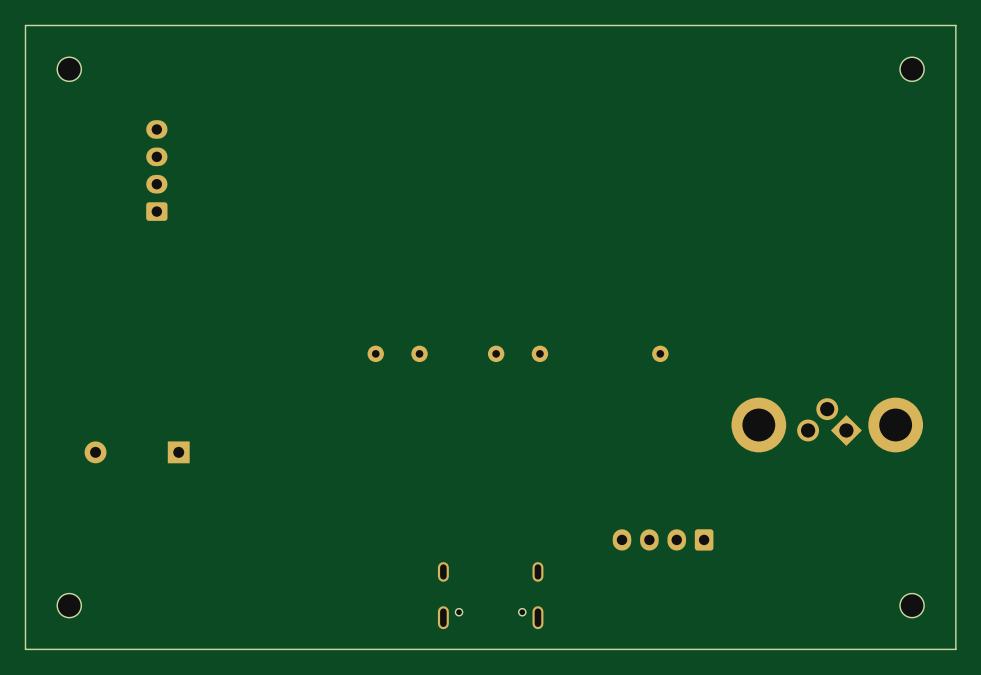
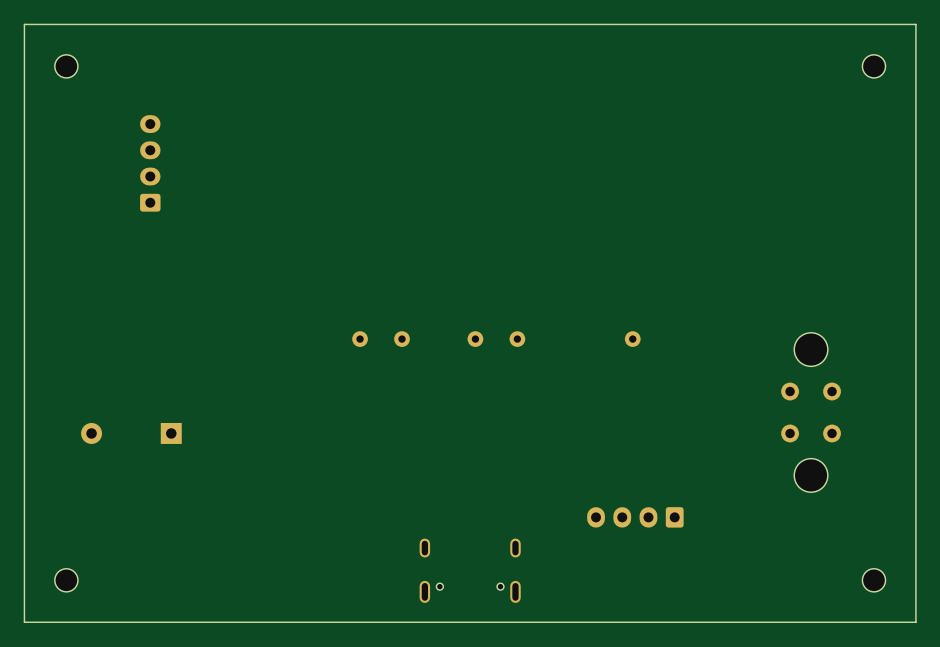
part: (827, 425) -> none
part: none -> (811, 412)

